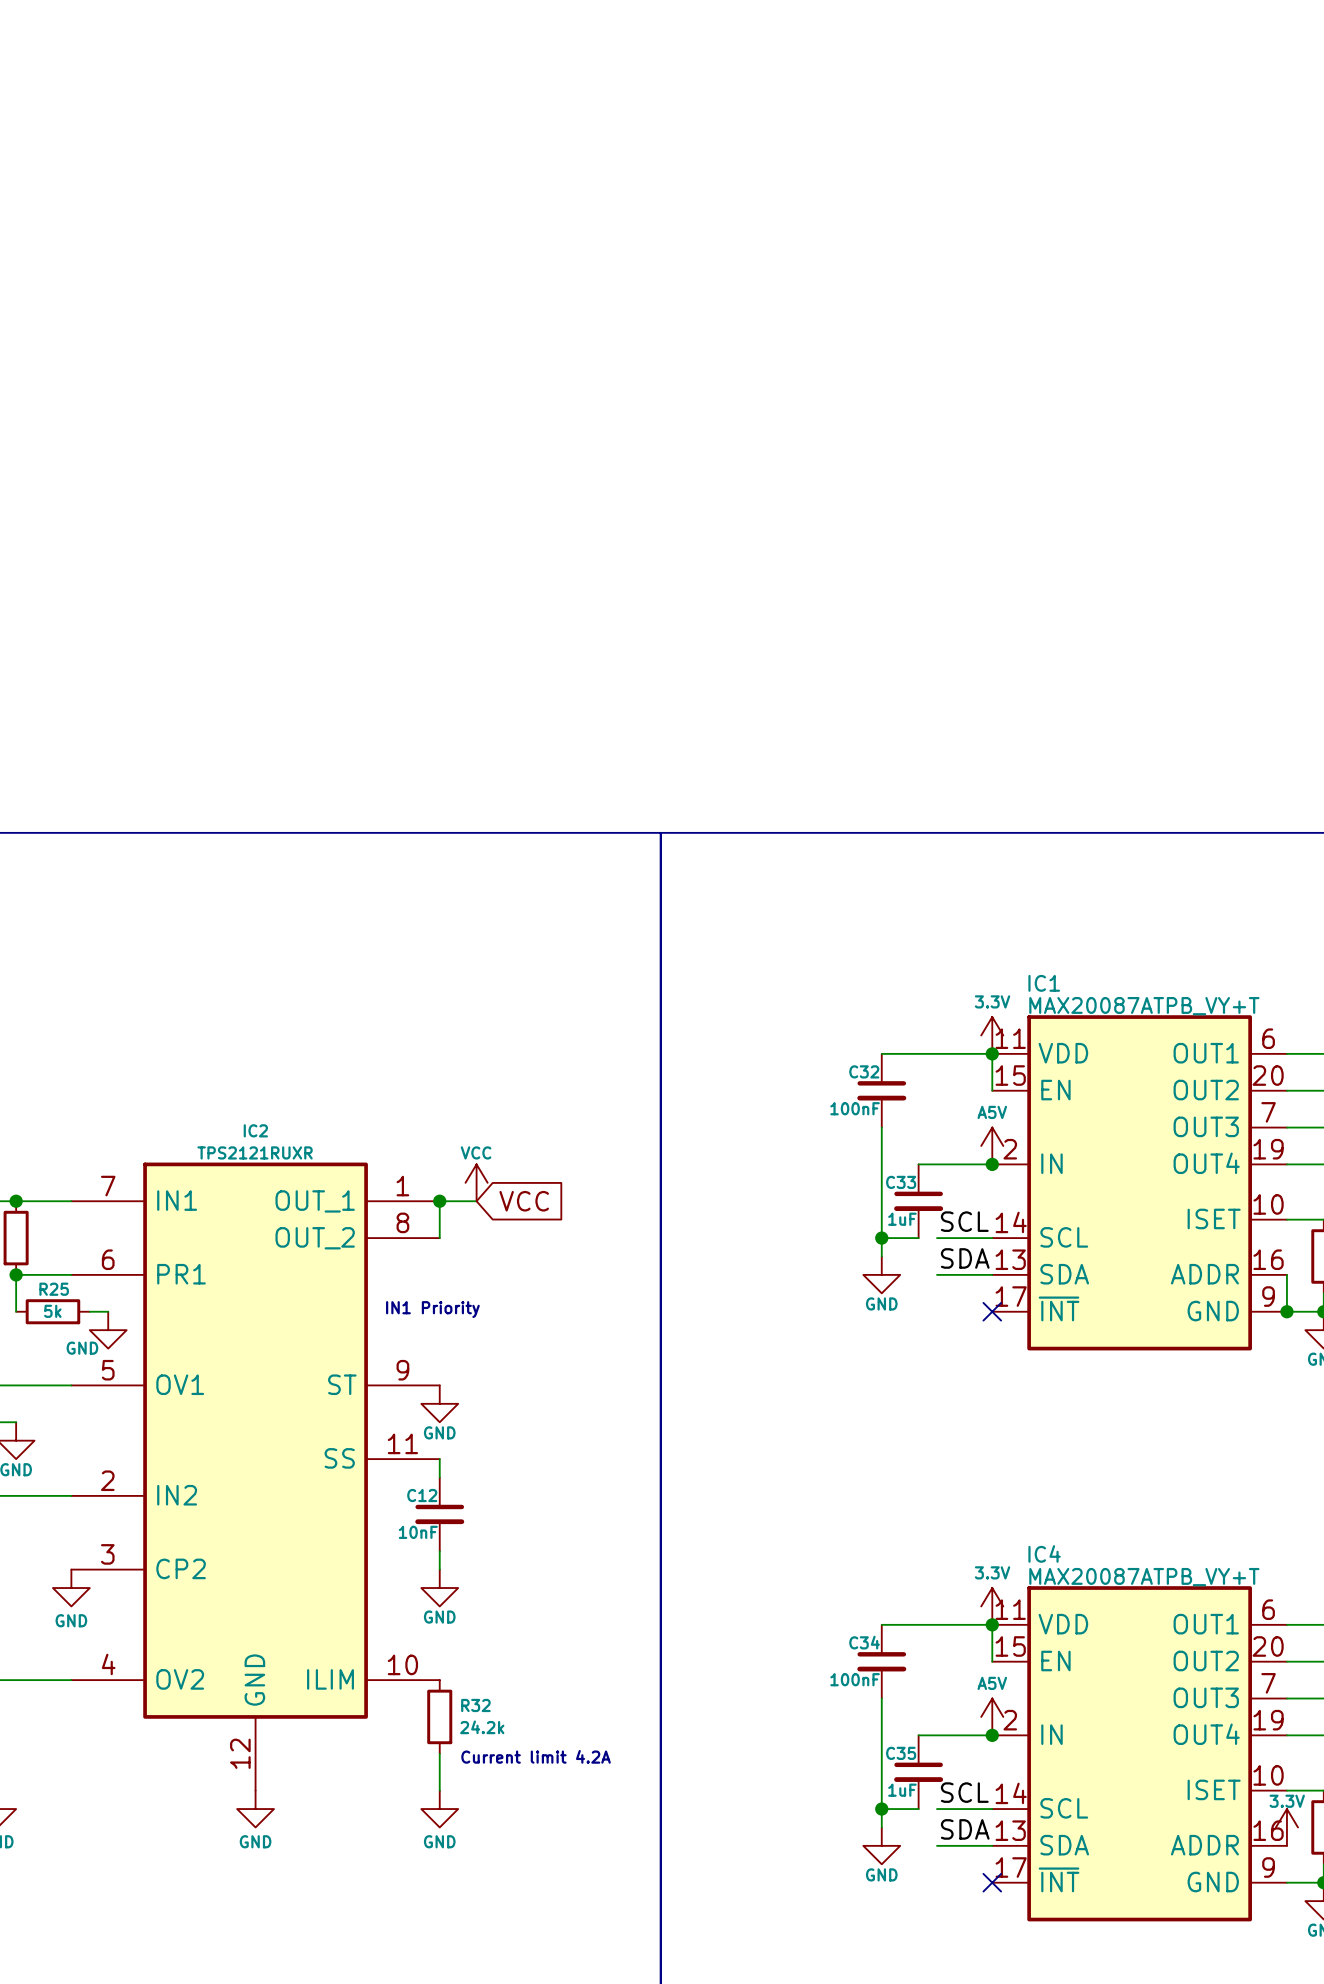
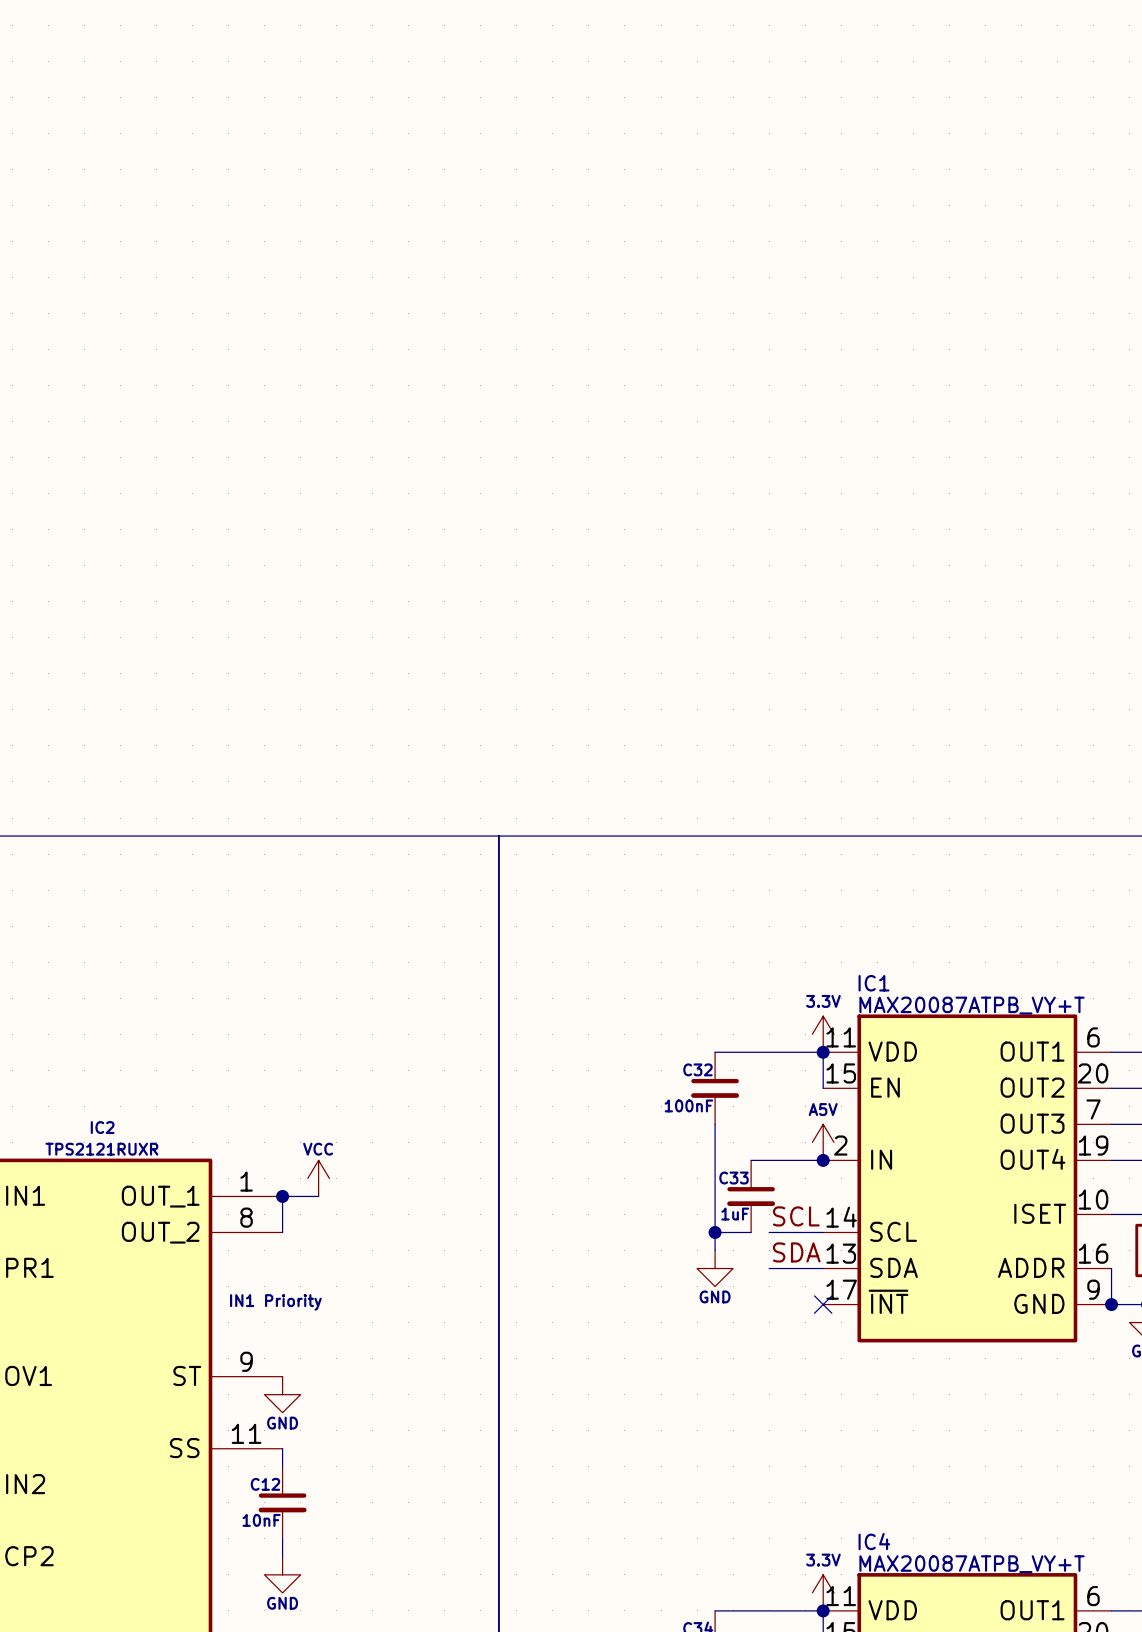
global label: VCC (524, 1201) -> none

